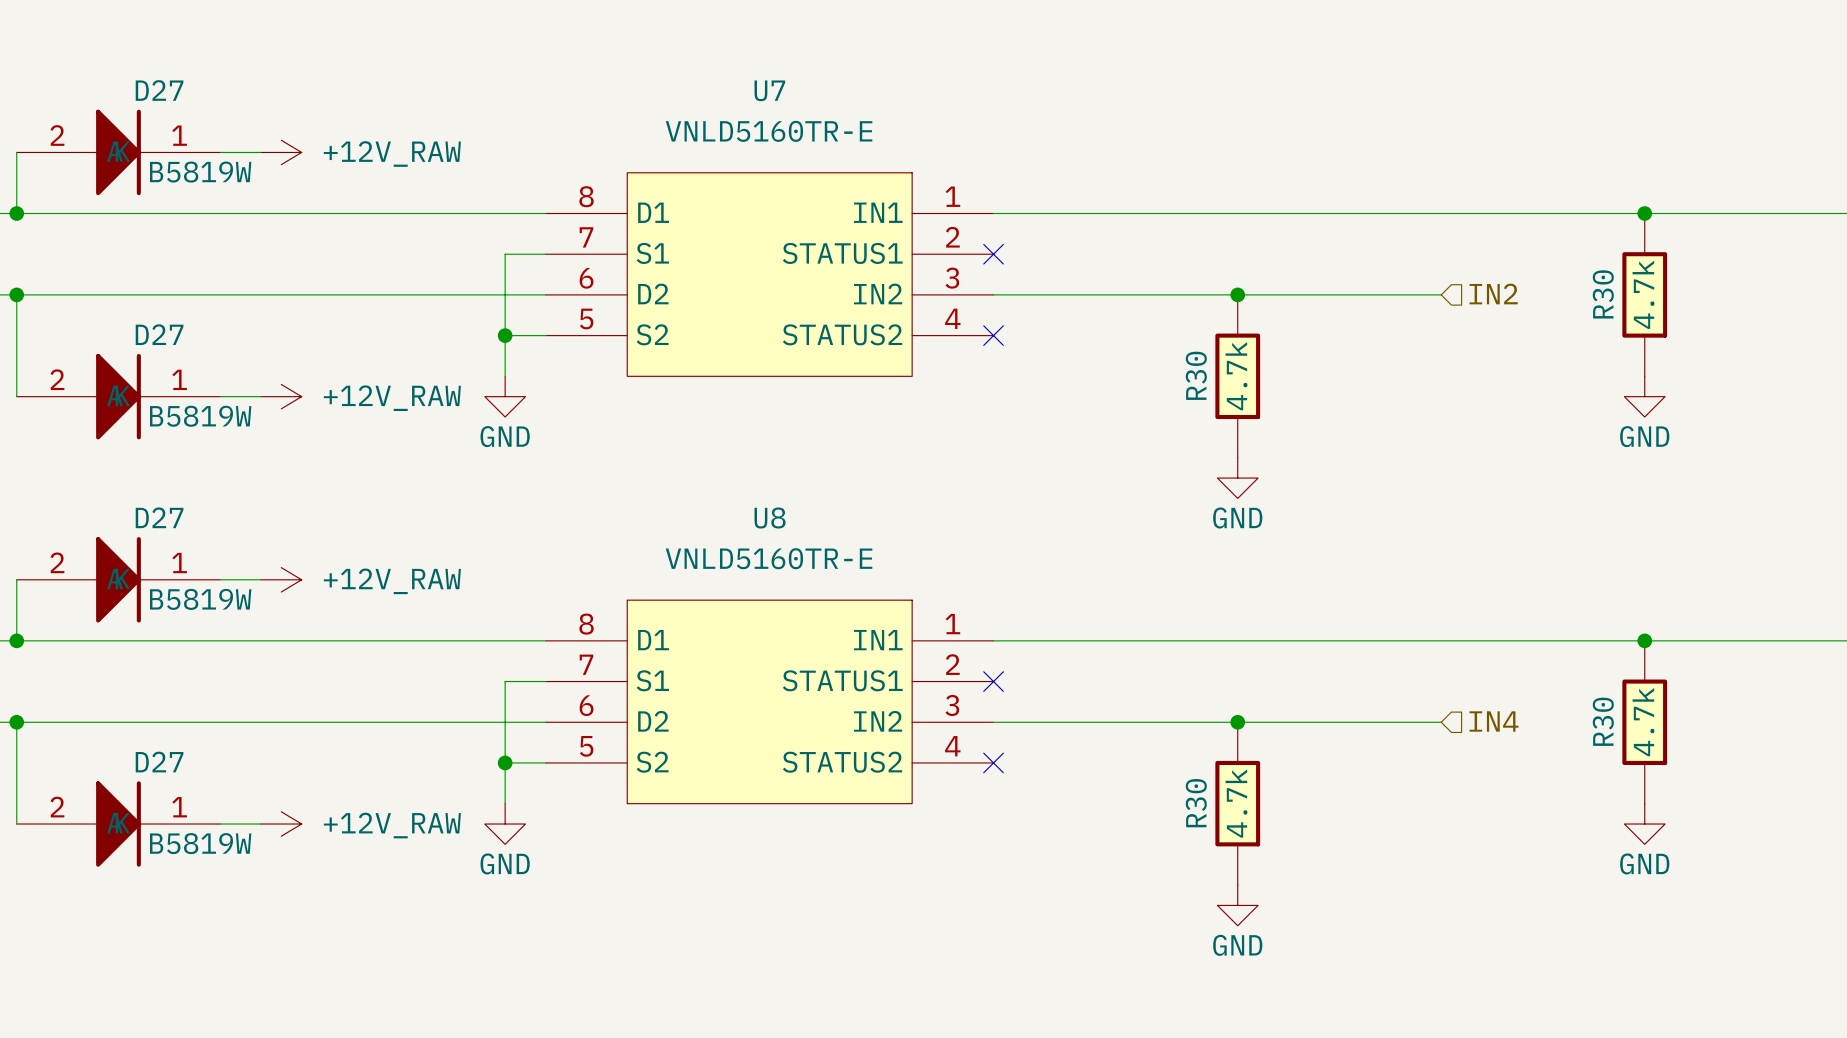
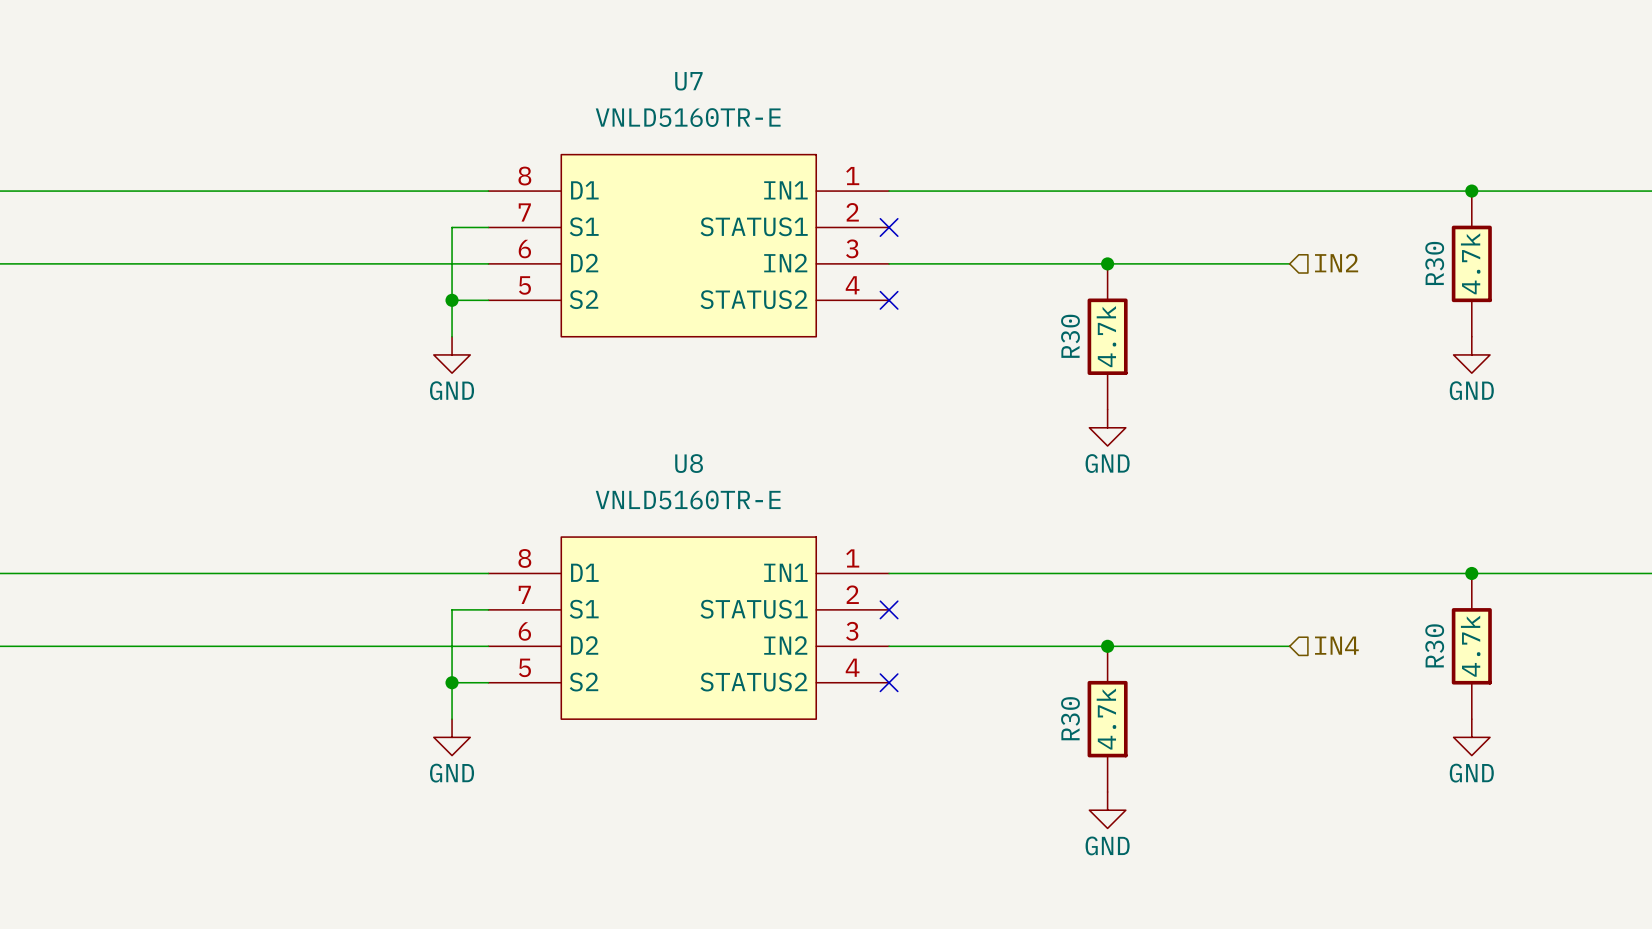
wire: (16, 152) (16, 213) -> none
D27: B5819W (118, 152) -> none
wire: (220, 152) (260, 152) -> none
power symbol: +12V_RAW (281, 152) -> none
junction: (16, 213) -> none
wire: (16, 294) (16, 396) -> none
junction: (16, 294) -> none
D27: B5819W (118, 396) -> none
wire: (220, 396) (260, 396) -> none
power symbol: +12V_RAW (281, 396) -> none
wire: (16, 579) (16, 640) -> none
D27: B5819W (118, 579) -> none
wire: (220, 579) (260, 579) -> none
power symbol: +12V_RAW (281, 579) -> none
junction: (16, 640) -> none
wire: (16, 722) (16, 824) -> none
junction: (16, 722) -> none
D27: B5819W (118, 824) -> none
wire: (220, 824) (260, 824) -> none
power symbol: +12V_RAW (281, 824) -> none

